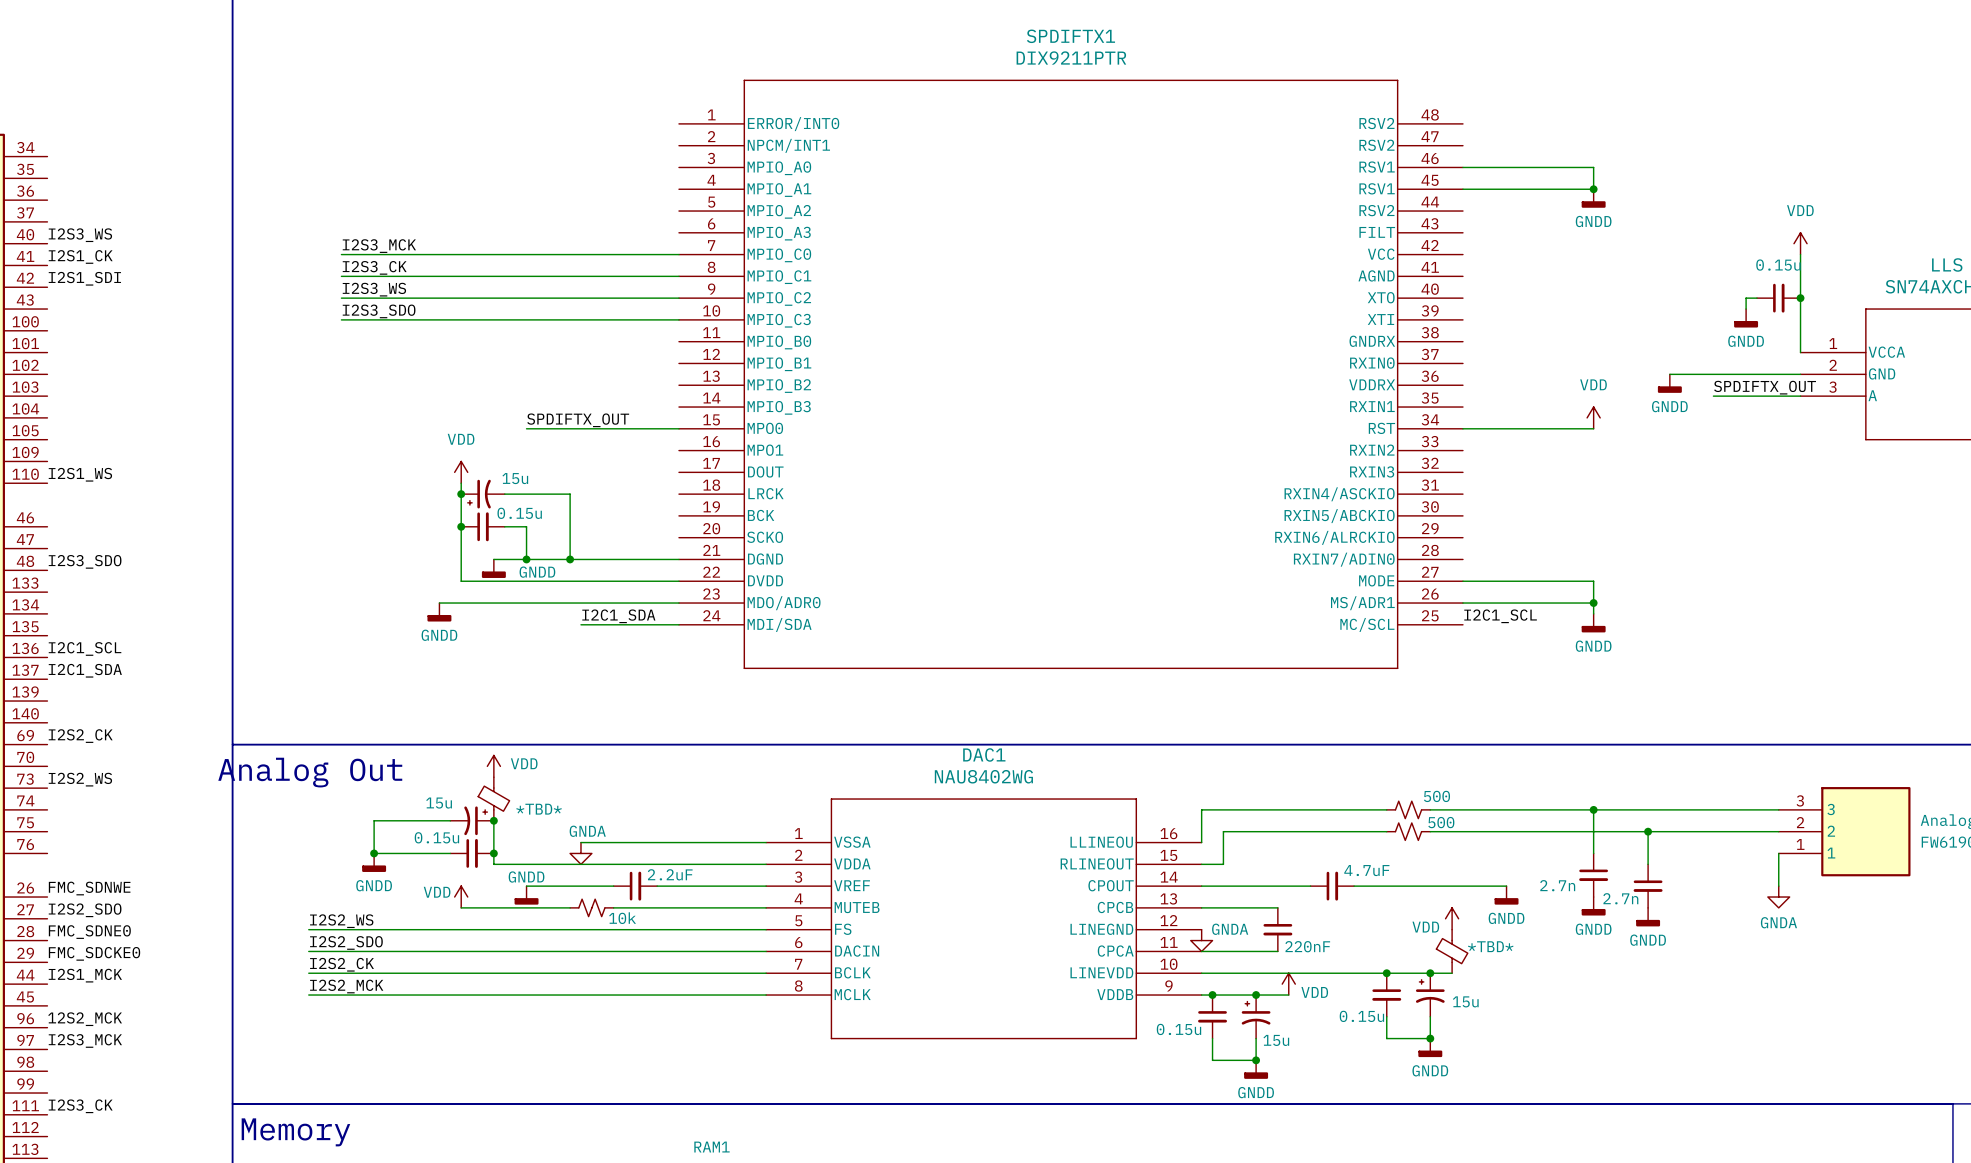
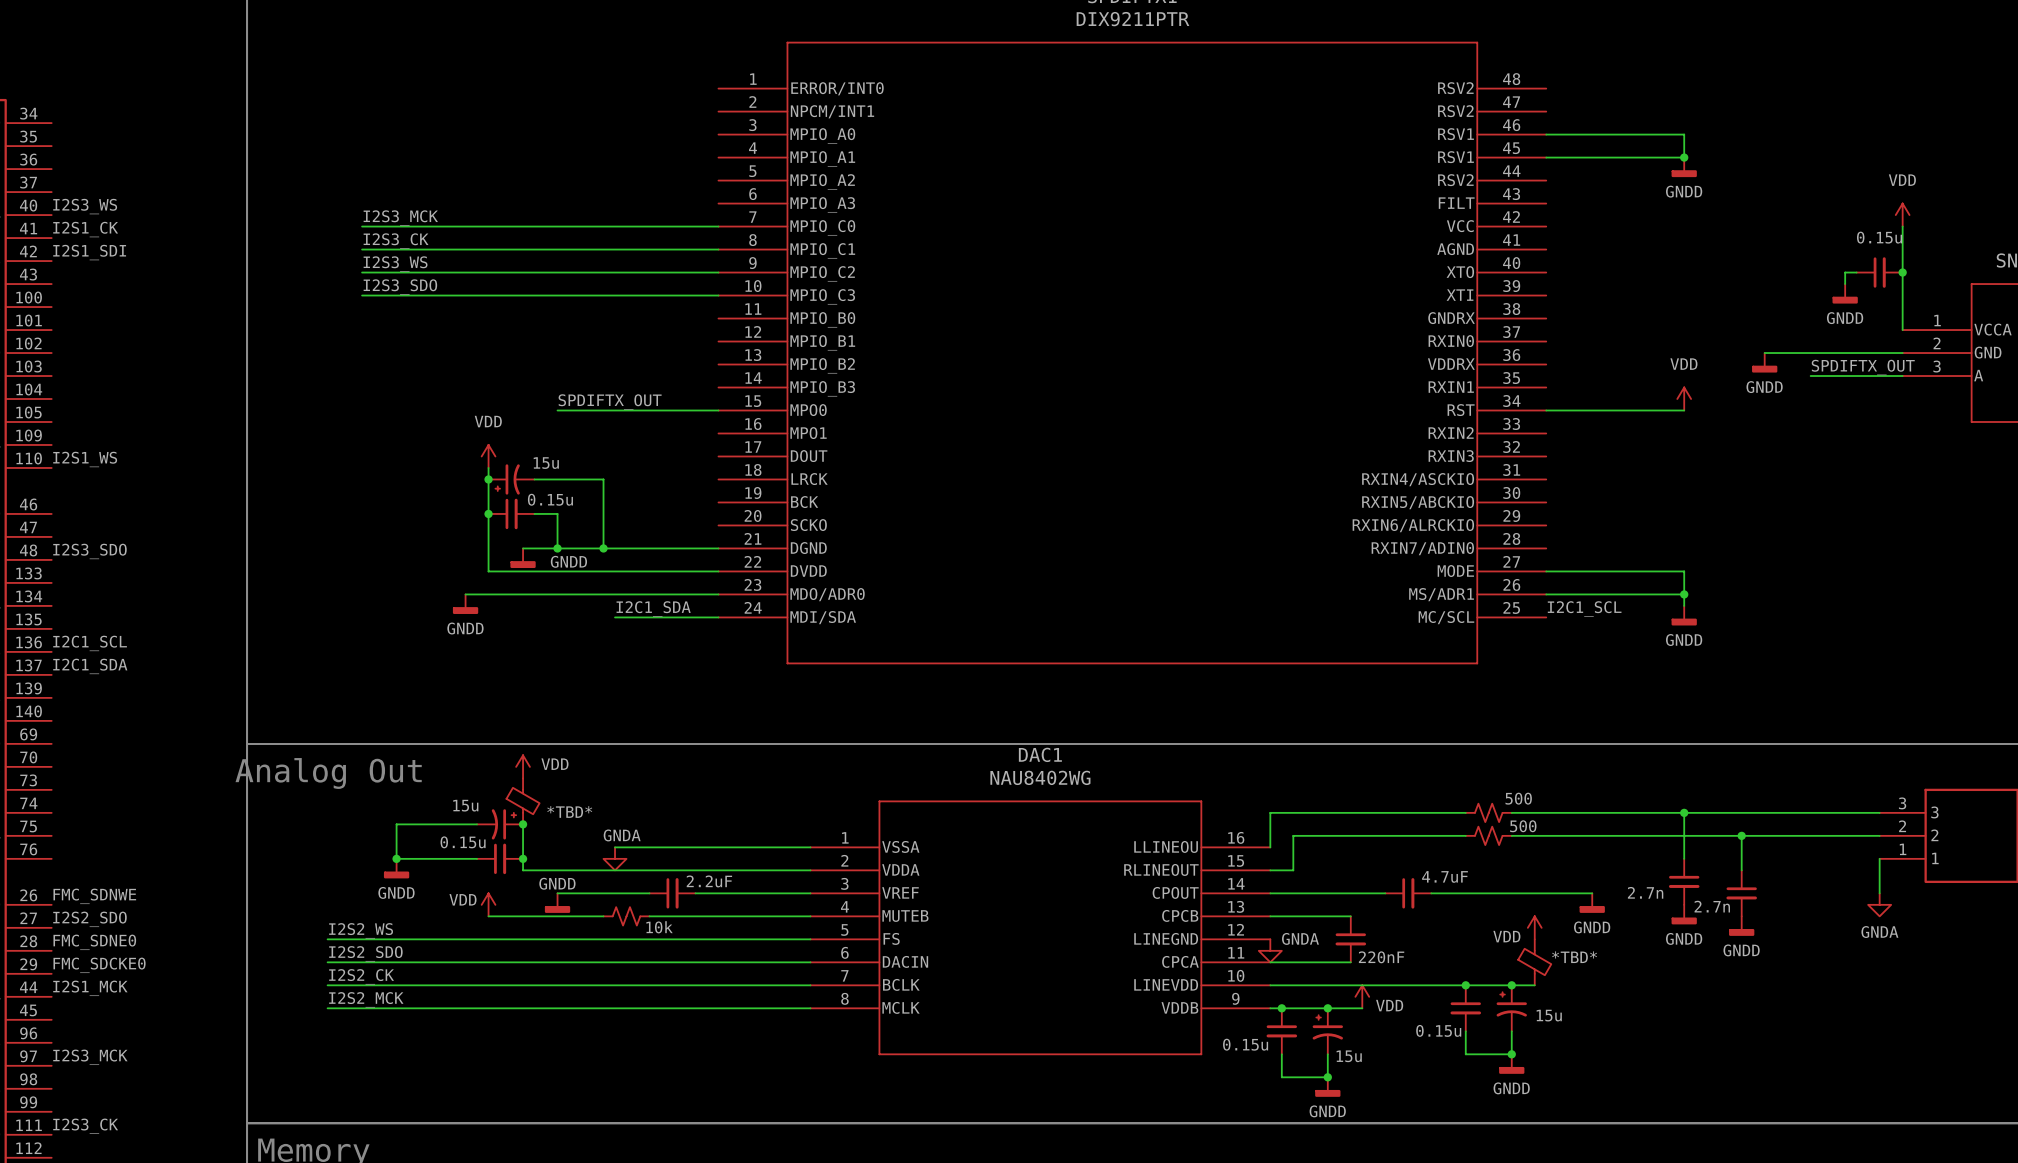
label: I2S2_CK (80, 736) -> none
label: I2S2_WS (80, 779) -> none
label: 12S2_MCK (85, 1019) -> none

